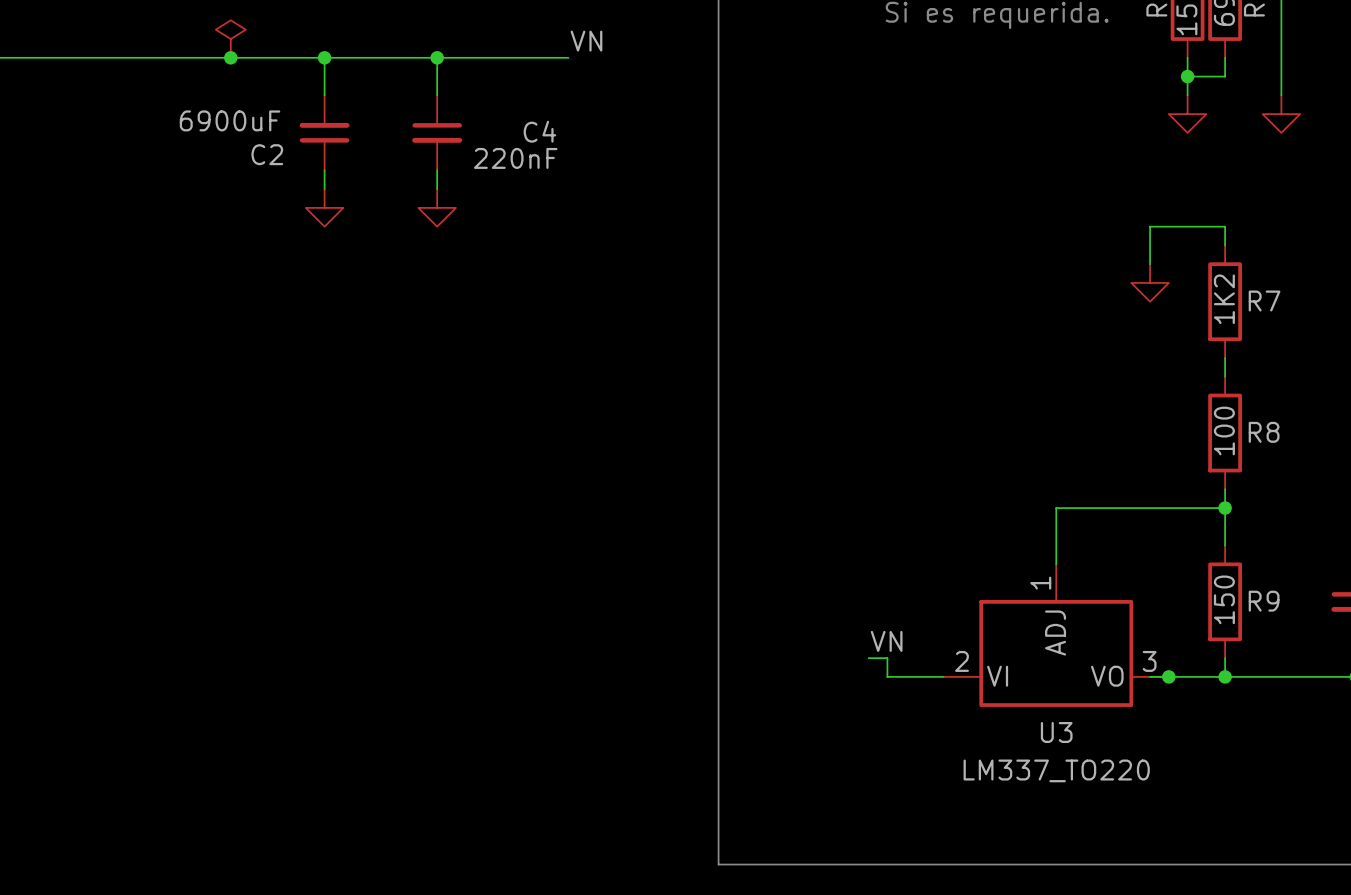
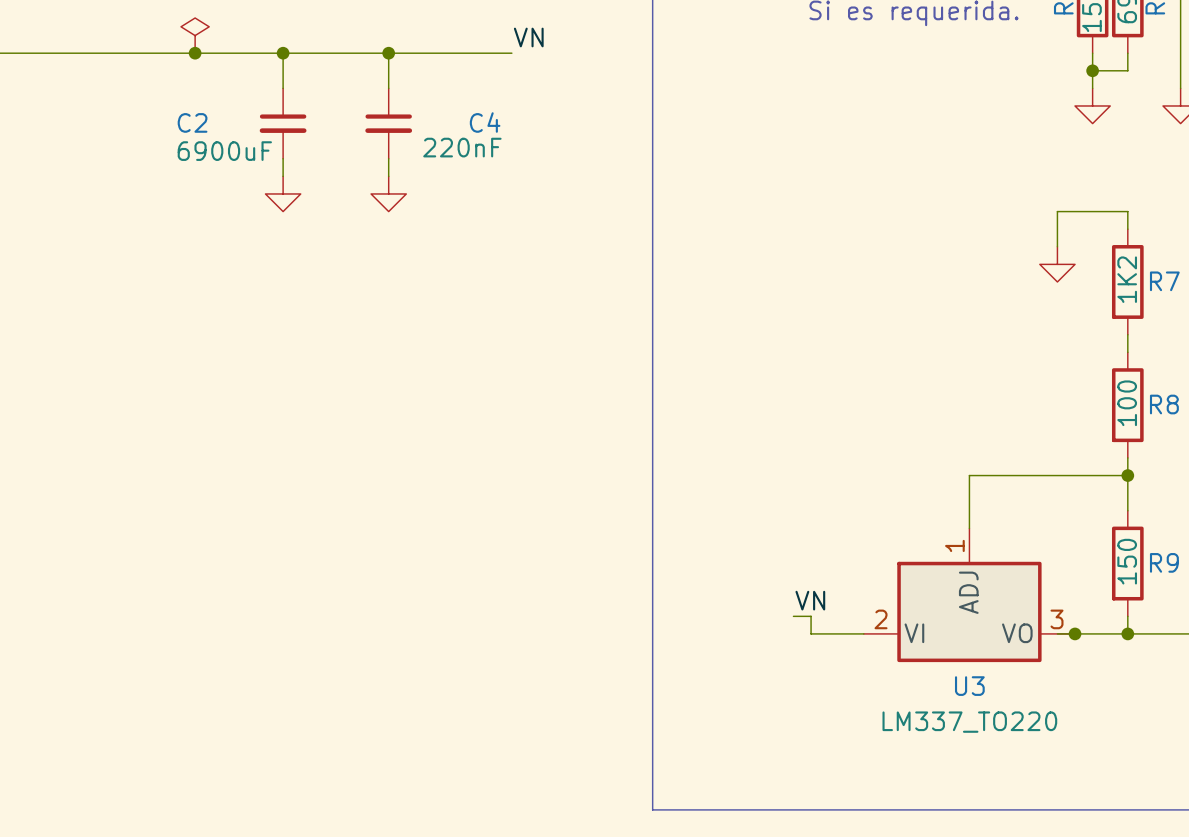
C2 value position: 6900uF (230, 120) -> 6900uF (224, 151)
C2 rotation: 0° (324, 132) -> 180° (283, 123)
C2 name position: C2 (267, 154) -> C2 (192, 122)

